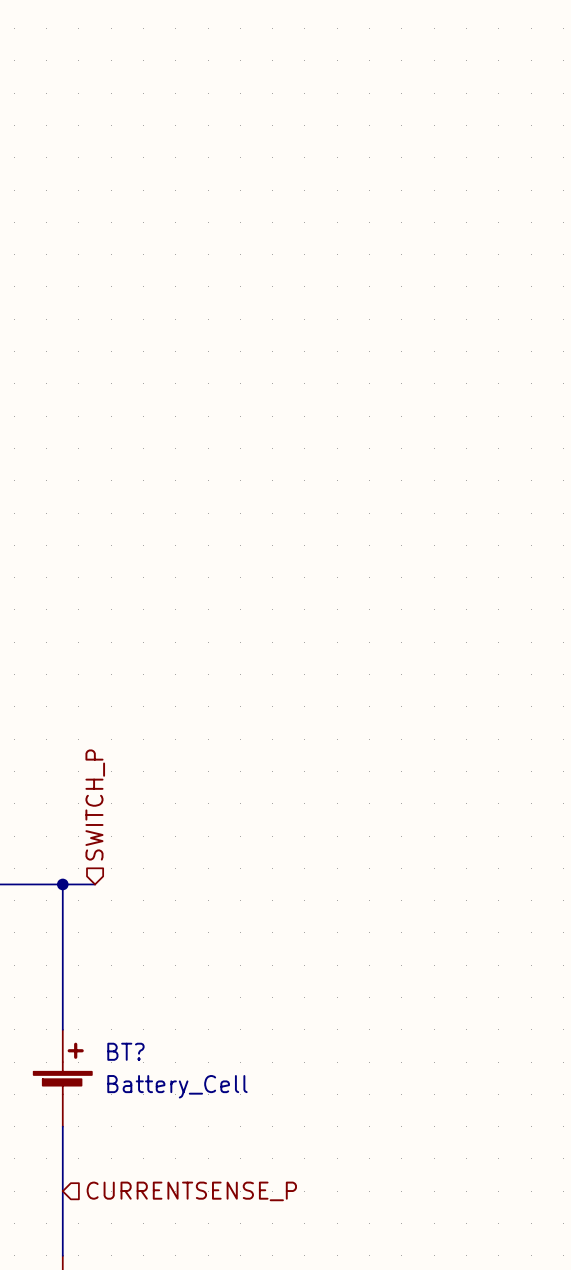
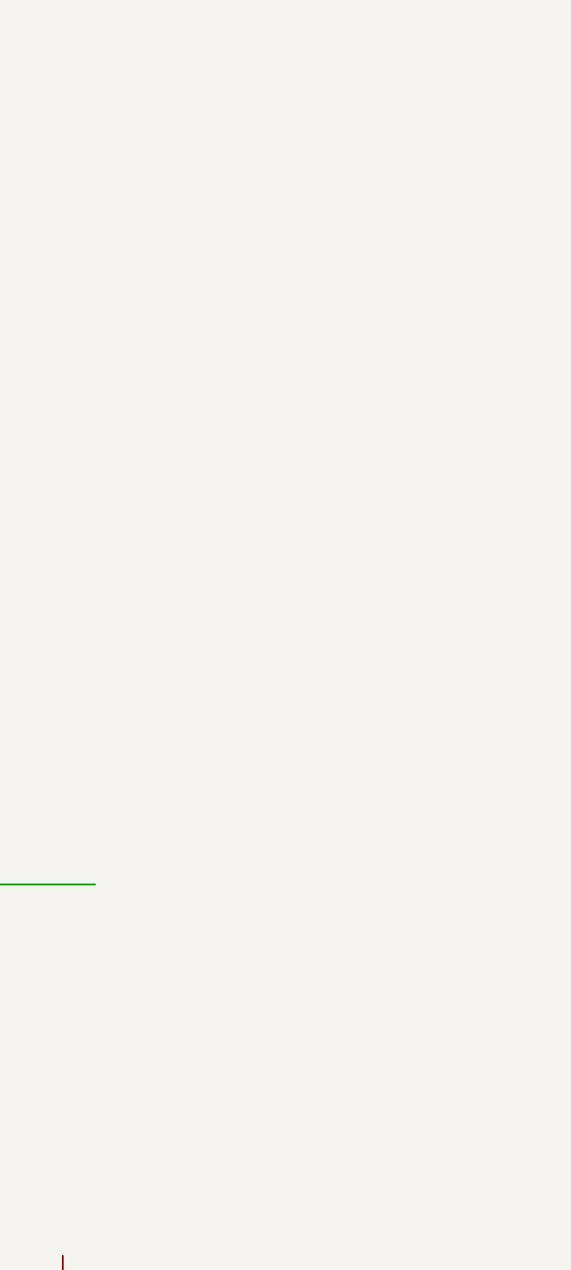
hierarchical label: SWITCH_P (95, 805) -> none
wire: (62, 884) (62, 1029) -> none
junction: (62, 884) -> none
BT?: Battery_Cell (62, 1078) -> none
wire: (62, 1126) (62, 1255) -> none
hierarchical label: CURRENTSENSE_P (191, 1191) -> none

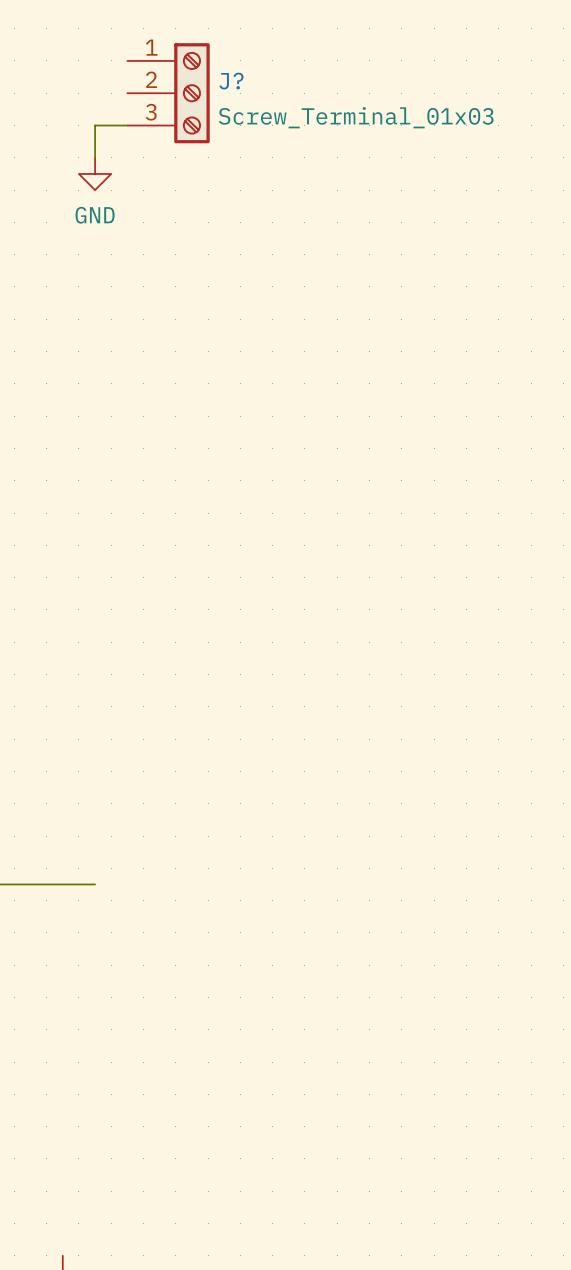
J?: none -> Screw_Terminal_01x03 (168, 93)
wire: none -> (127, 125) (95, 125) (95, 157)
power symbol: none -> GND (95, 173)

